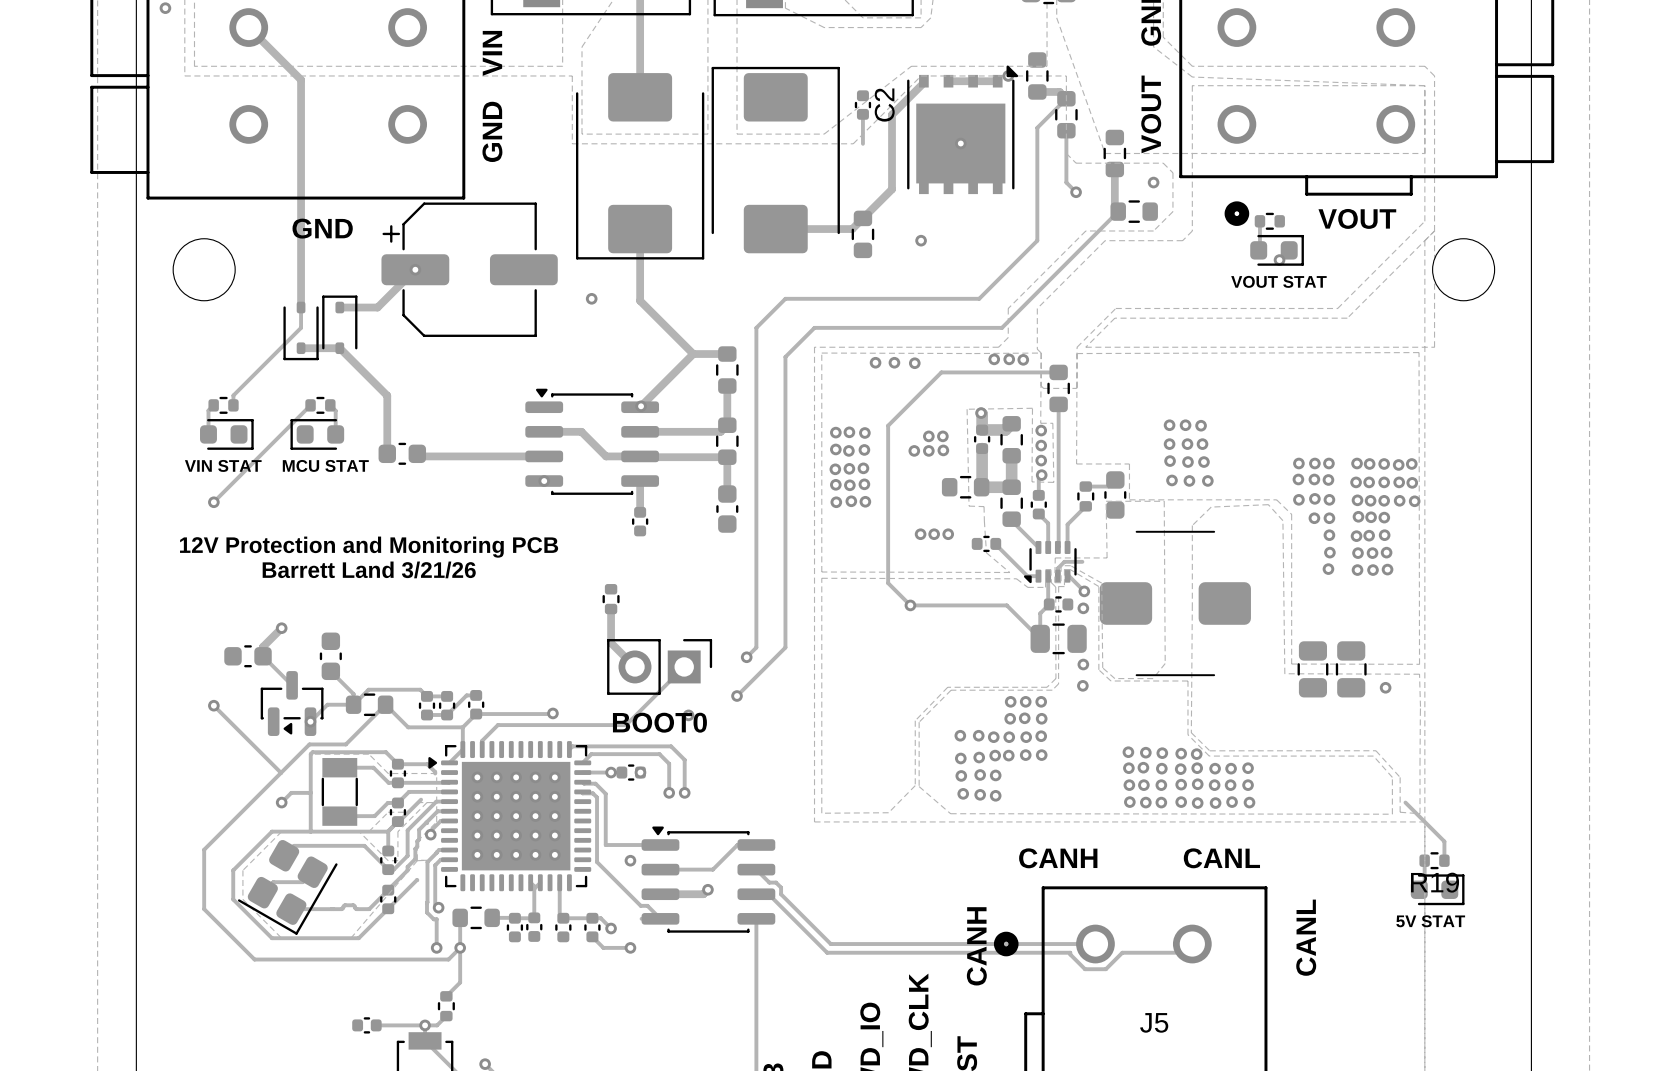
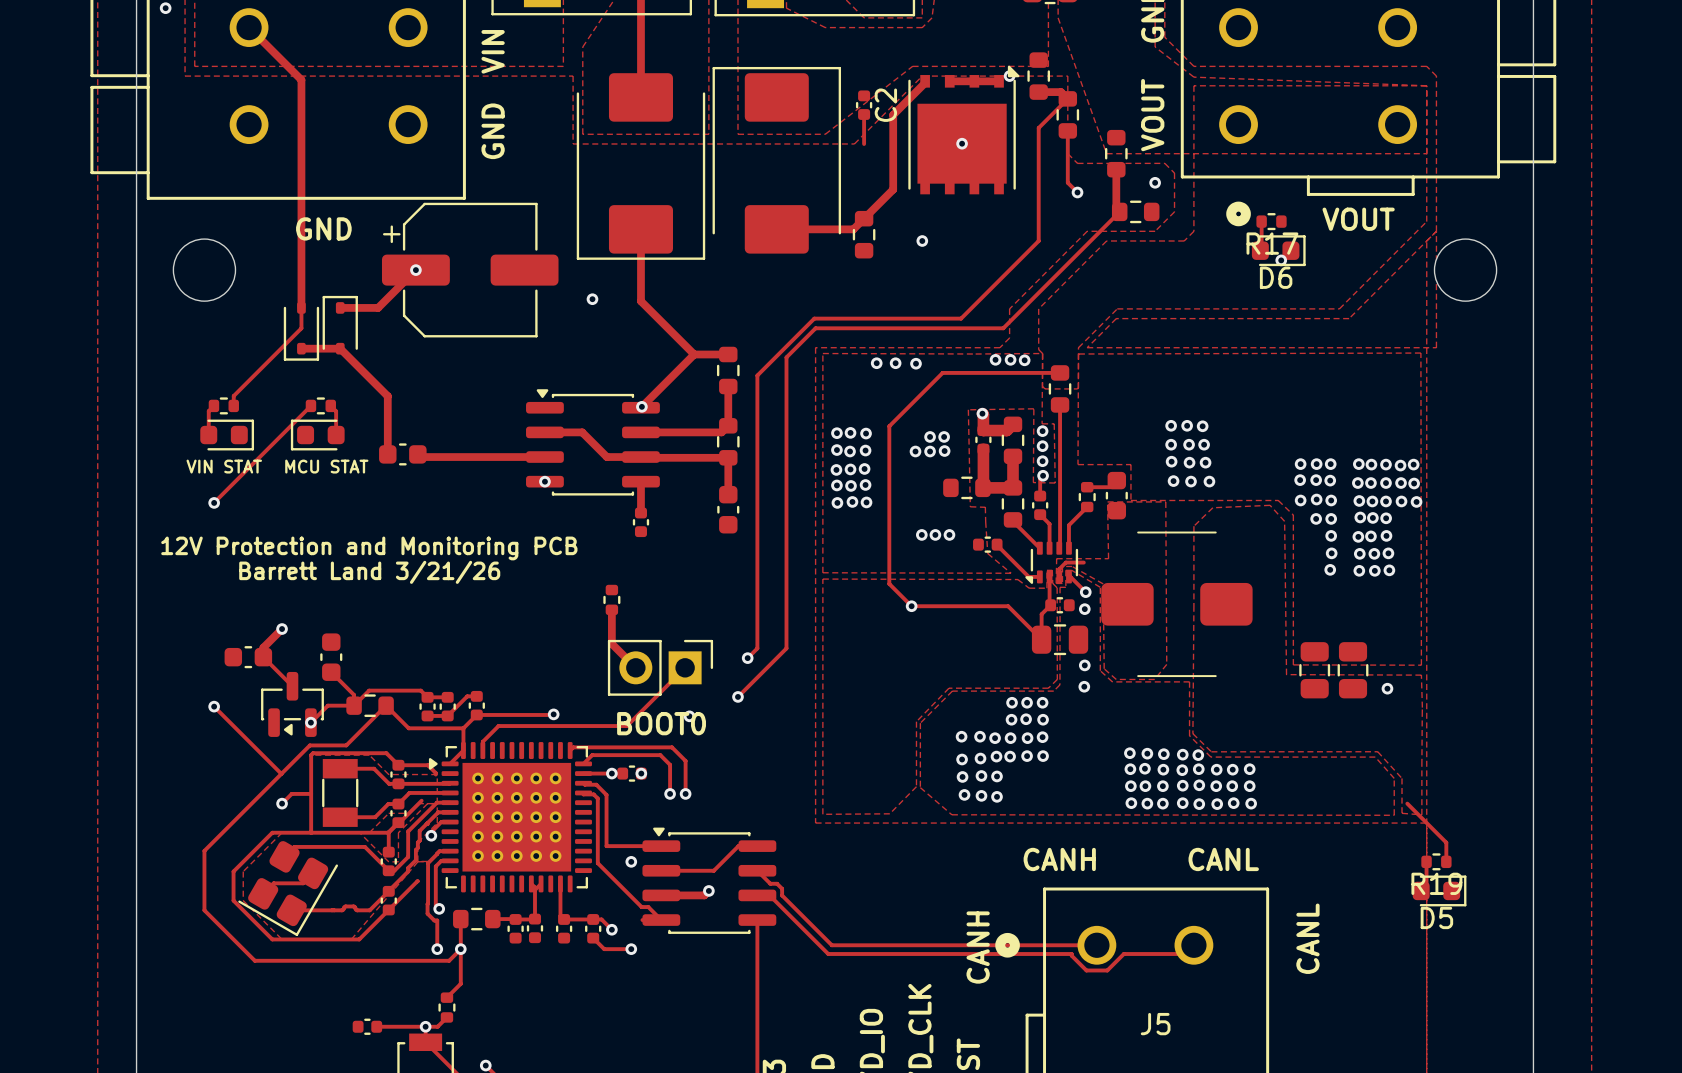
R17 name: none -> R17 (1272, 243)
D6 name: none -> D6 (1276, 277)
text: VOUT STAT (1278, 281) -> none
track: (979, 298) (785, 298) (756, 327) (756, 375) -> (980, 299) (961, 318) (814, 318) (757, 375)
D5 name: none -> D5 (1436, 917)
text: 5V STAT (1430, 921) -> none

